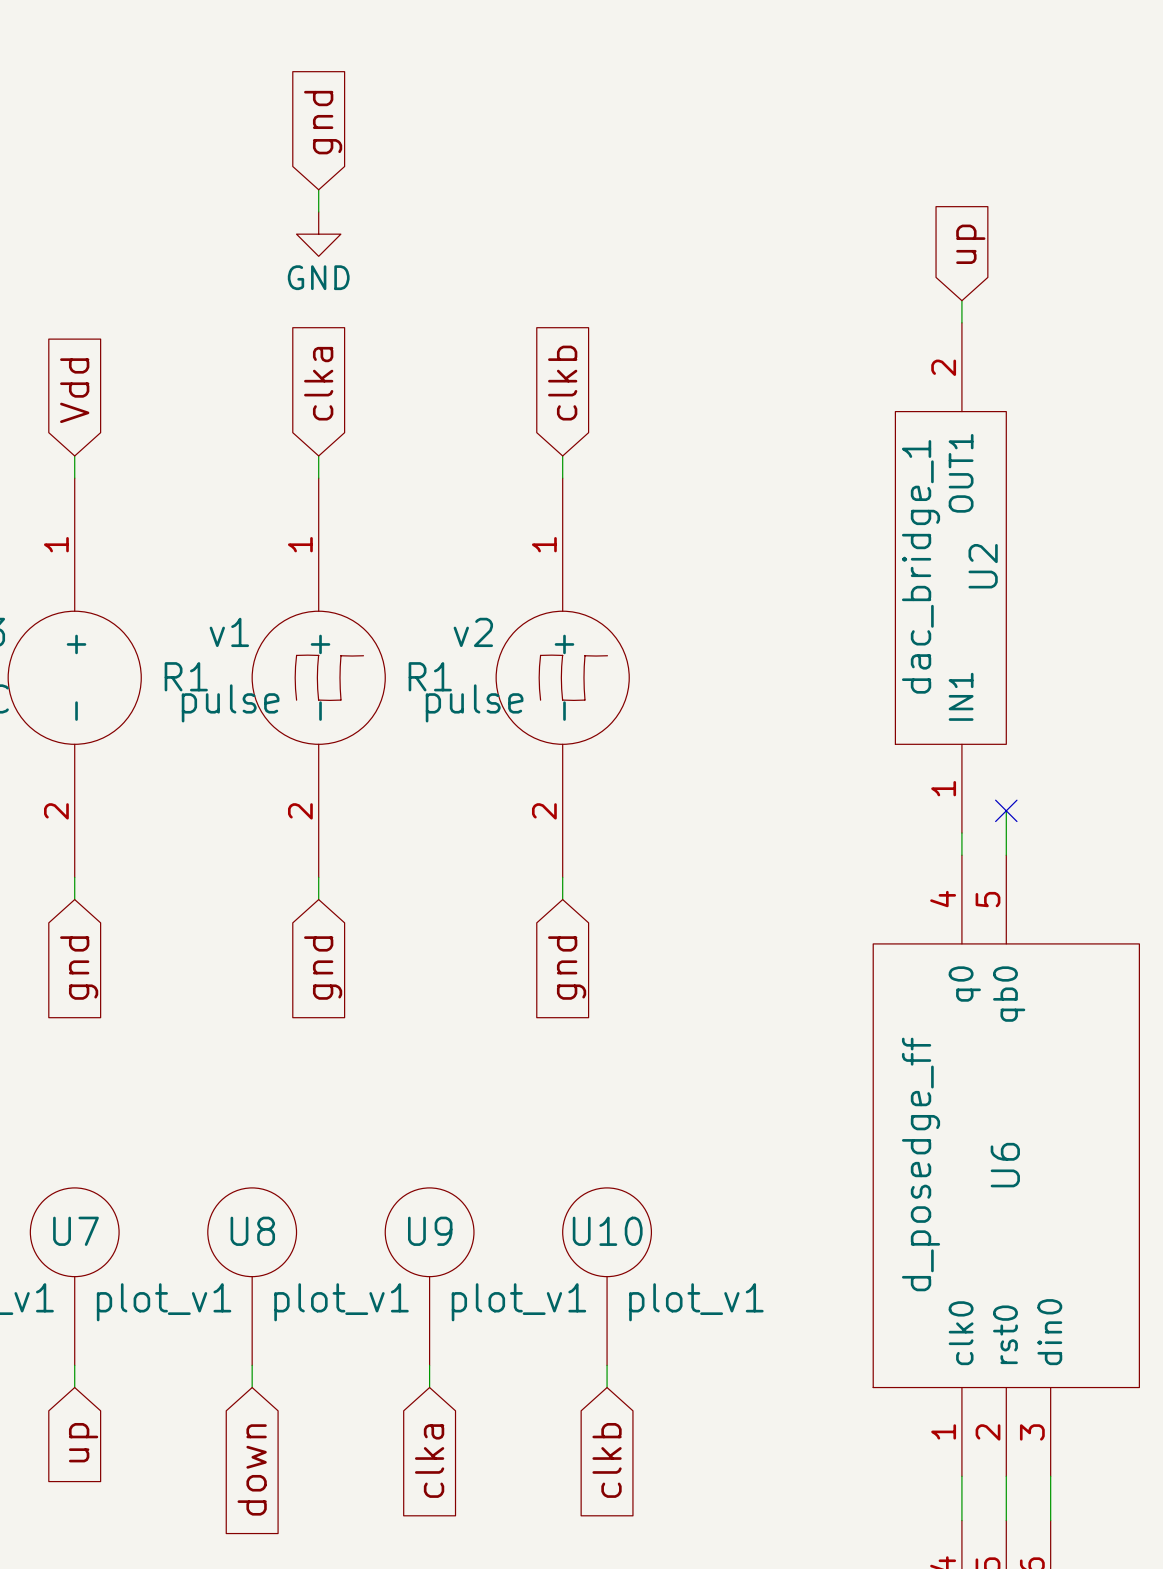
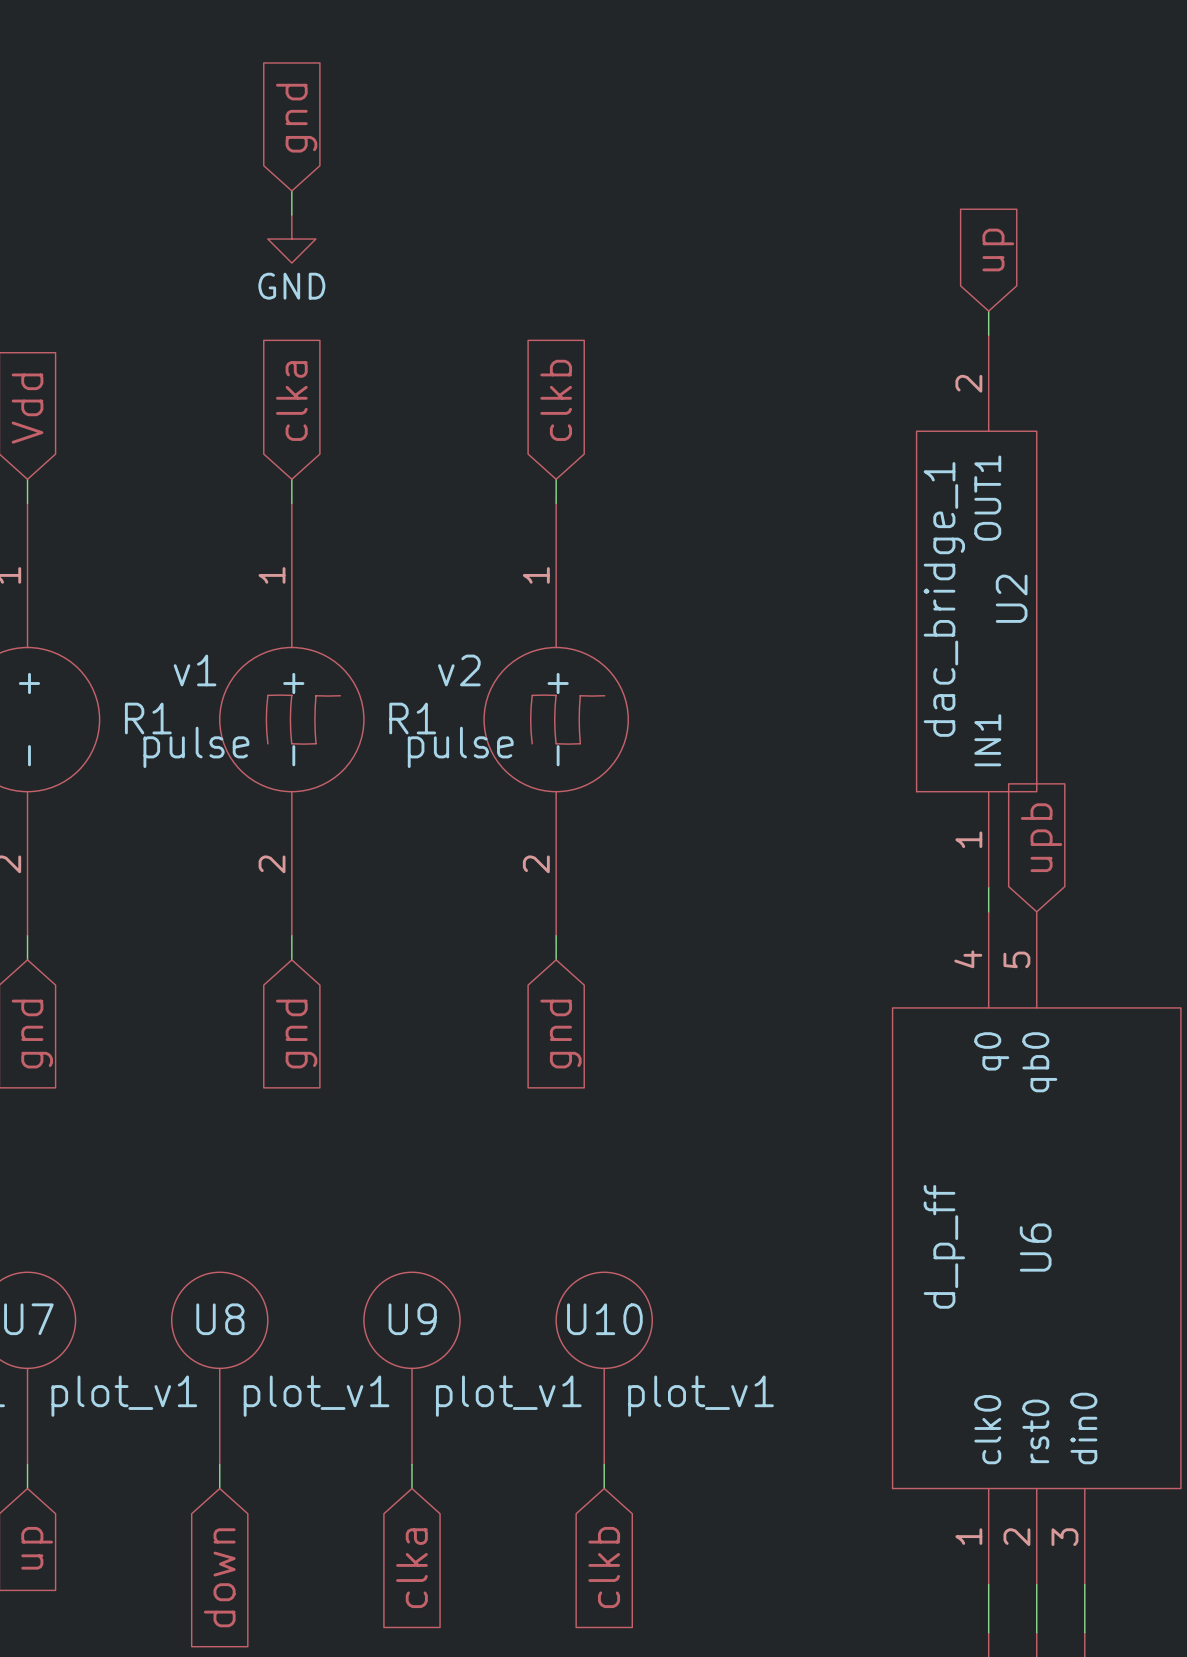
global label: none -> upb (1041, 837)
wire: (1006, 810) (1006, 855) -> none
no-connect mark: (1006, 810) -> none
U6 value: d_posedge_ff (921, 1164) -> d_p_ff (944, 1246)

